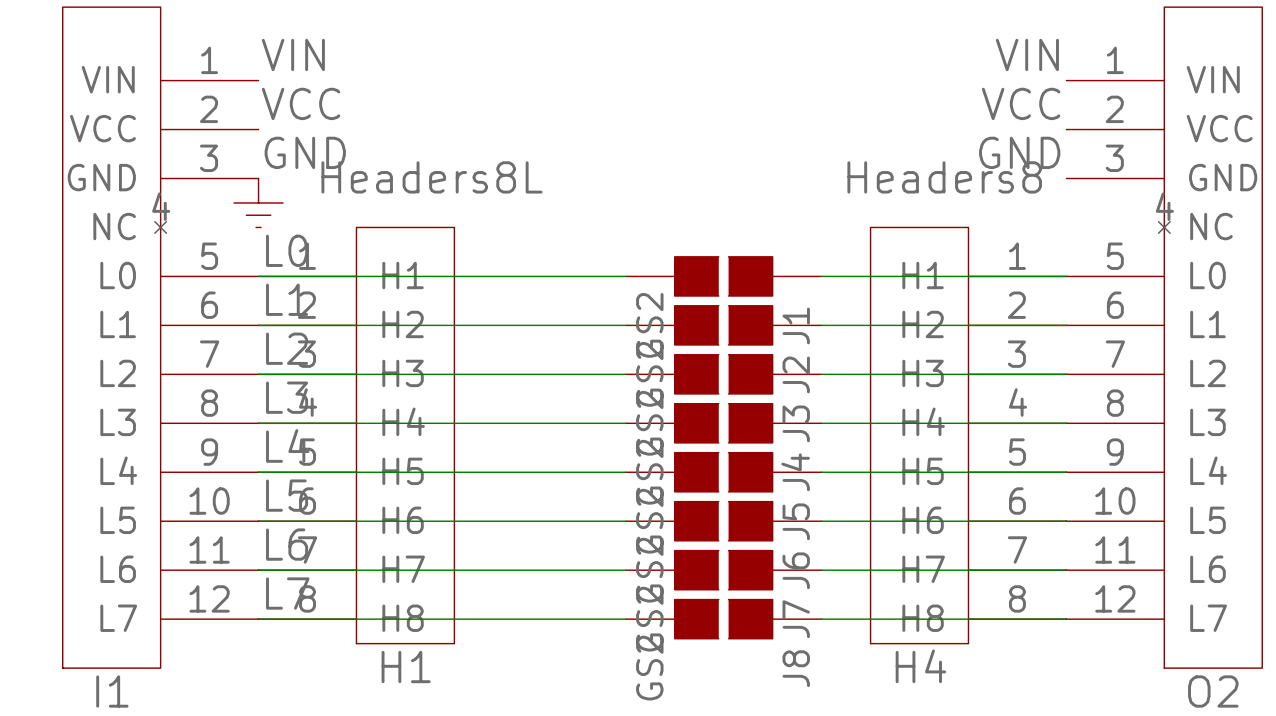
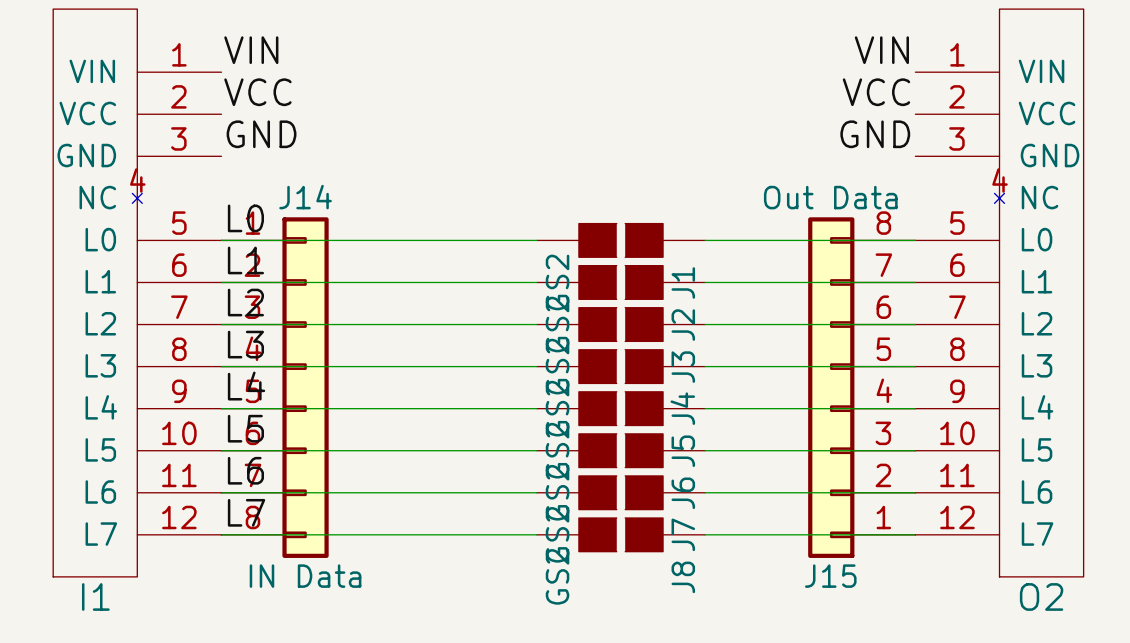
power symbol: (258, 202) -> none
H1: Headers8L (356, 435) -> none
H4: Headers8 (968, 435) -> none
J14: none -> IN Data (275, 387)
J15: none -> Out Data (861, 387)

